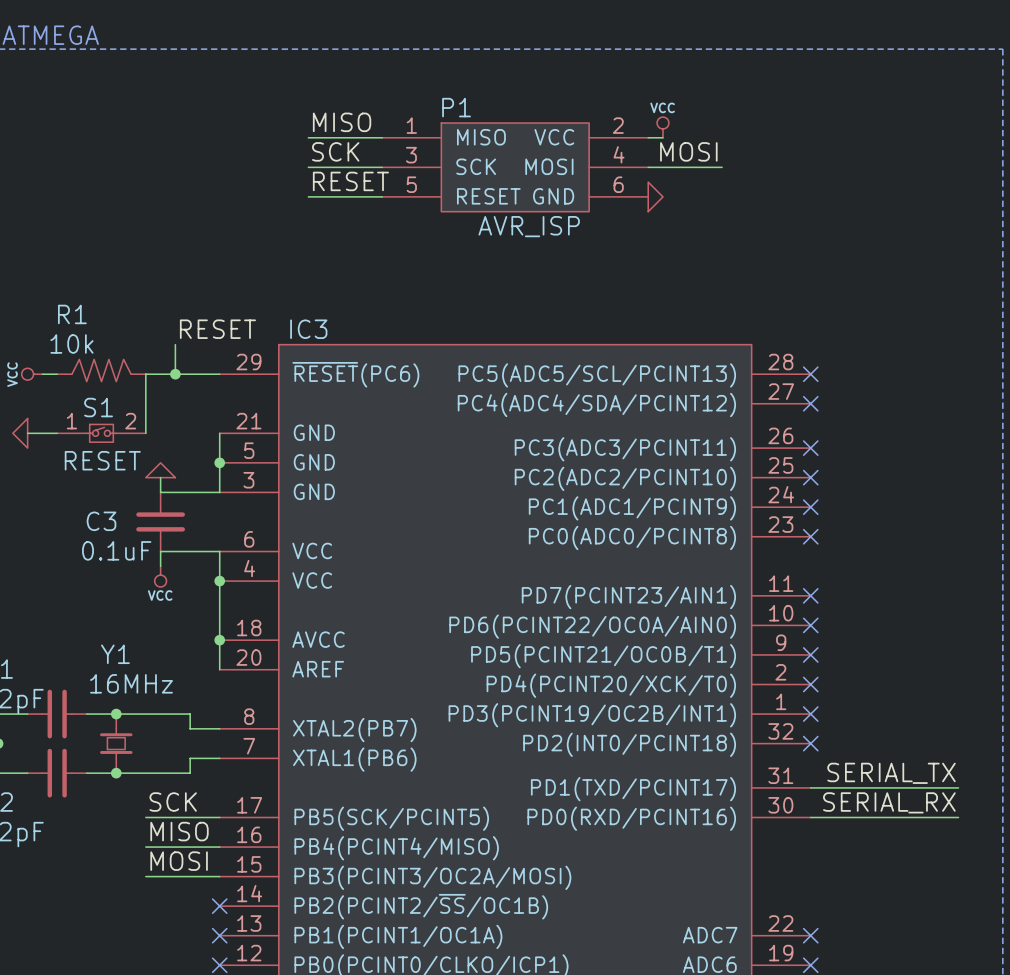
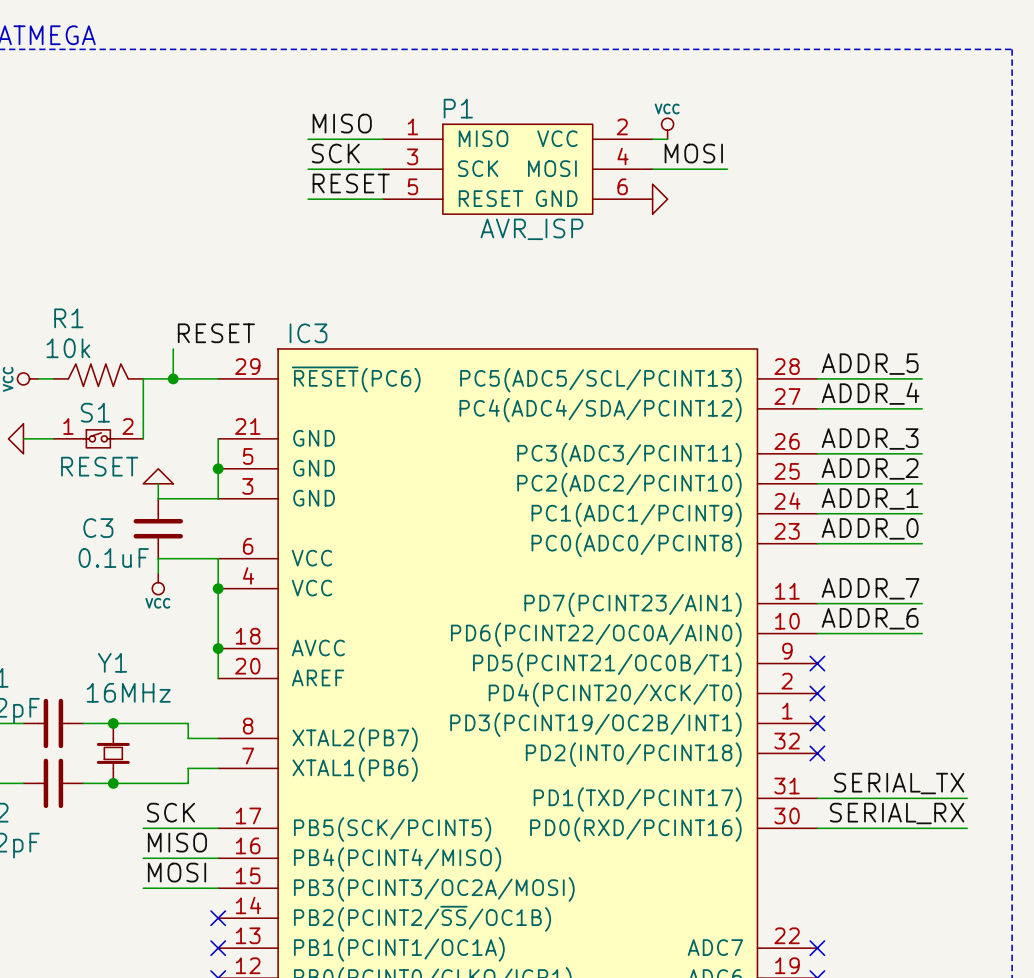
label: none -> ADDR_5 (870, 364)
wire: none -> (817, 378) (922, 378)
no-connect mark: (810, 374) -> none
label: none -> ADDR_4 (870, 393)
wire: none -> (817, 408) (922, 408)
no-connect mark: (810, 403) -> none
label: none -> ADDR_3 (870, 439)
wire: none -> (817, 453) (922, 453)
no-connect mark: (810, 448) -> none
label: none -> ADDR_2 (870, 468)
wire: none -> (817, 483) (922, 483)
no-connect mark: (810, 477) -> none
label: none -> ADDR_1 (870, 498)
wire: none -> (817, 513) (922, 513)
no-connect mark: (810, 507) -> none
label: none -> ADDR_0 (870, 528)
wire: none -> (817, 543) (922, 543)
no-connect mark: (810, 536) -> none
label: none -> ADDR_7 (870, 588)
wire: none -> (817, 603) (922, 603)
no-connect mark: (810, 595) -> none
label: none -> ADDR_6 (870, 618)
wire: none -> (817, 633) (922, 633)
no-connect mark: (810, 625) -> none

